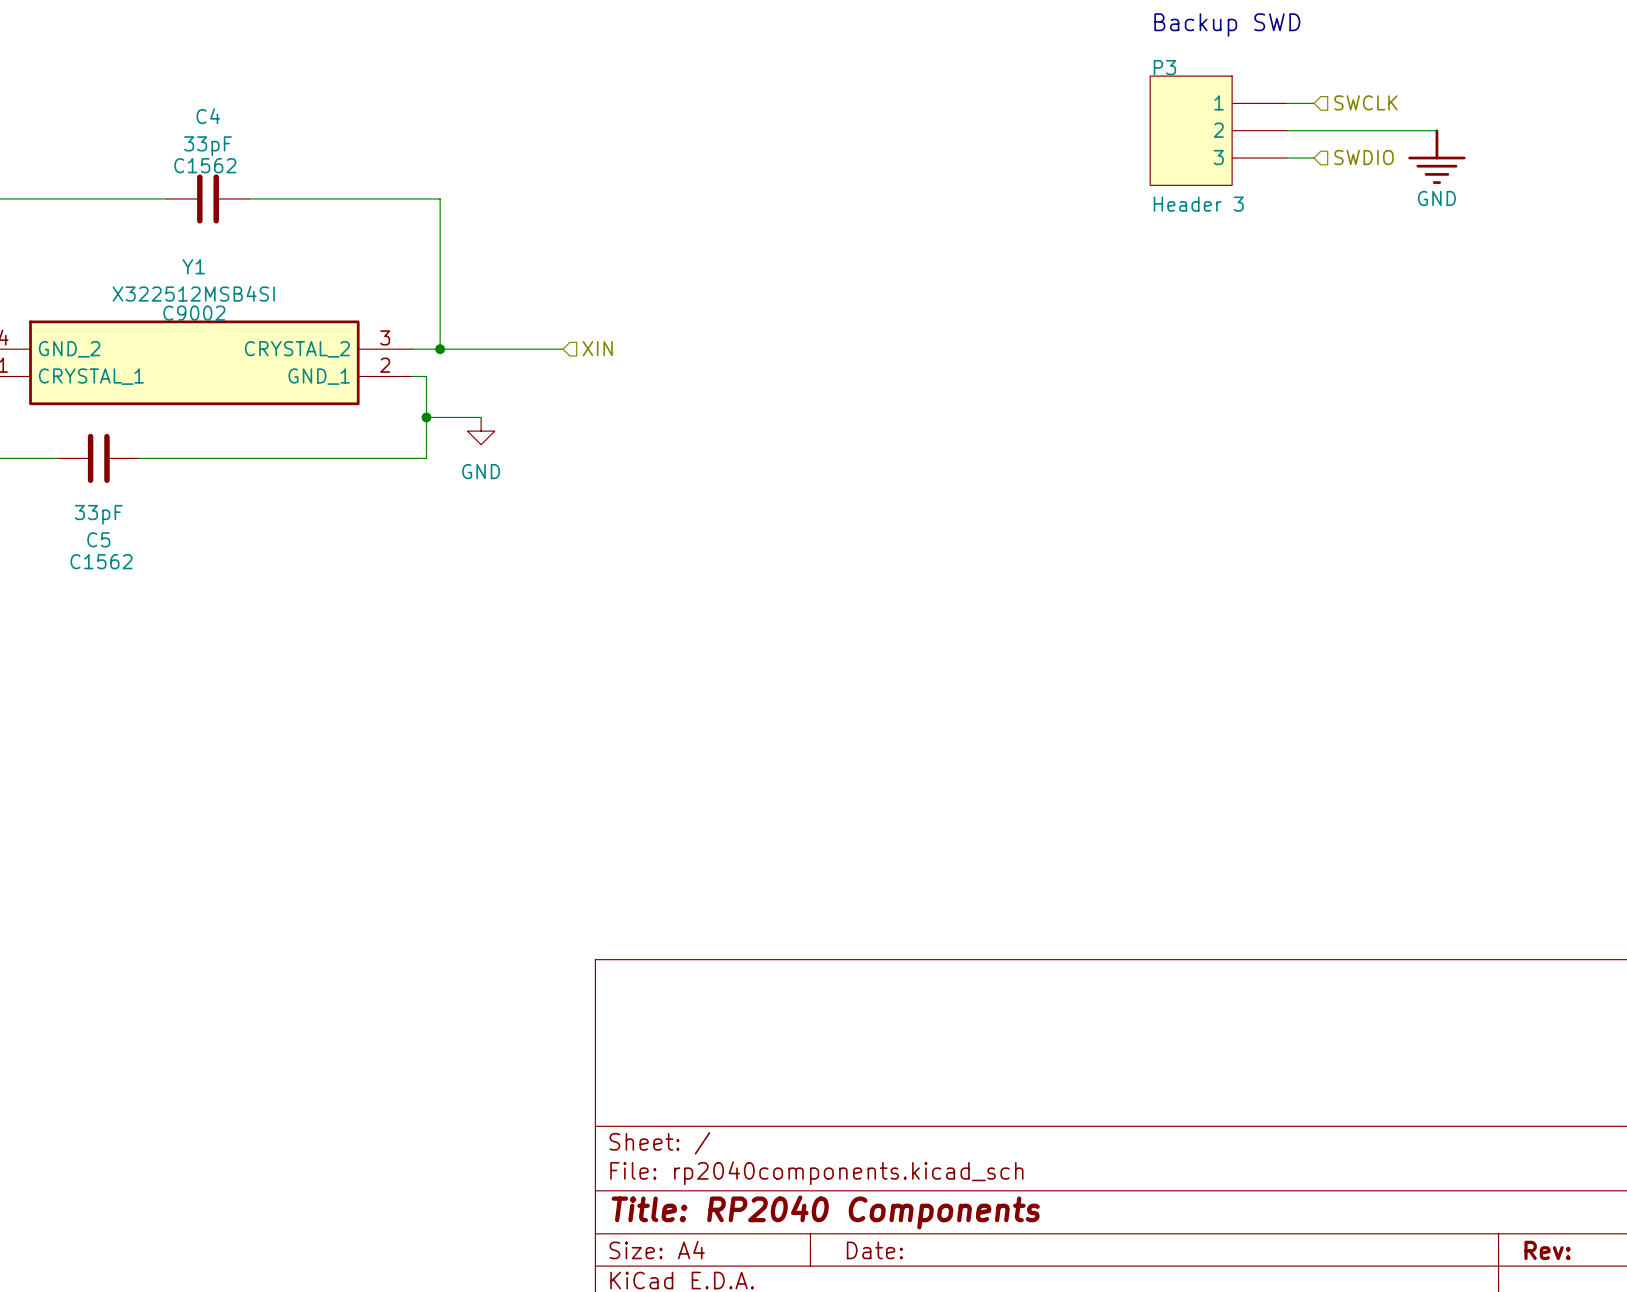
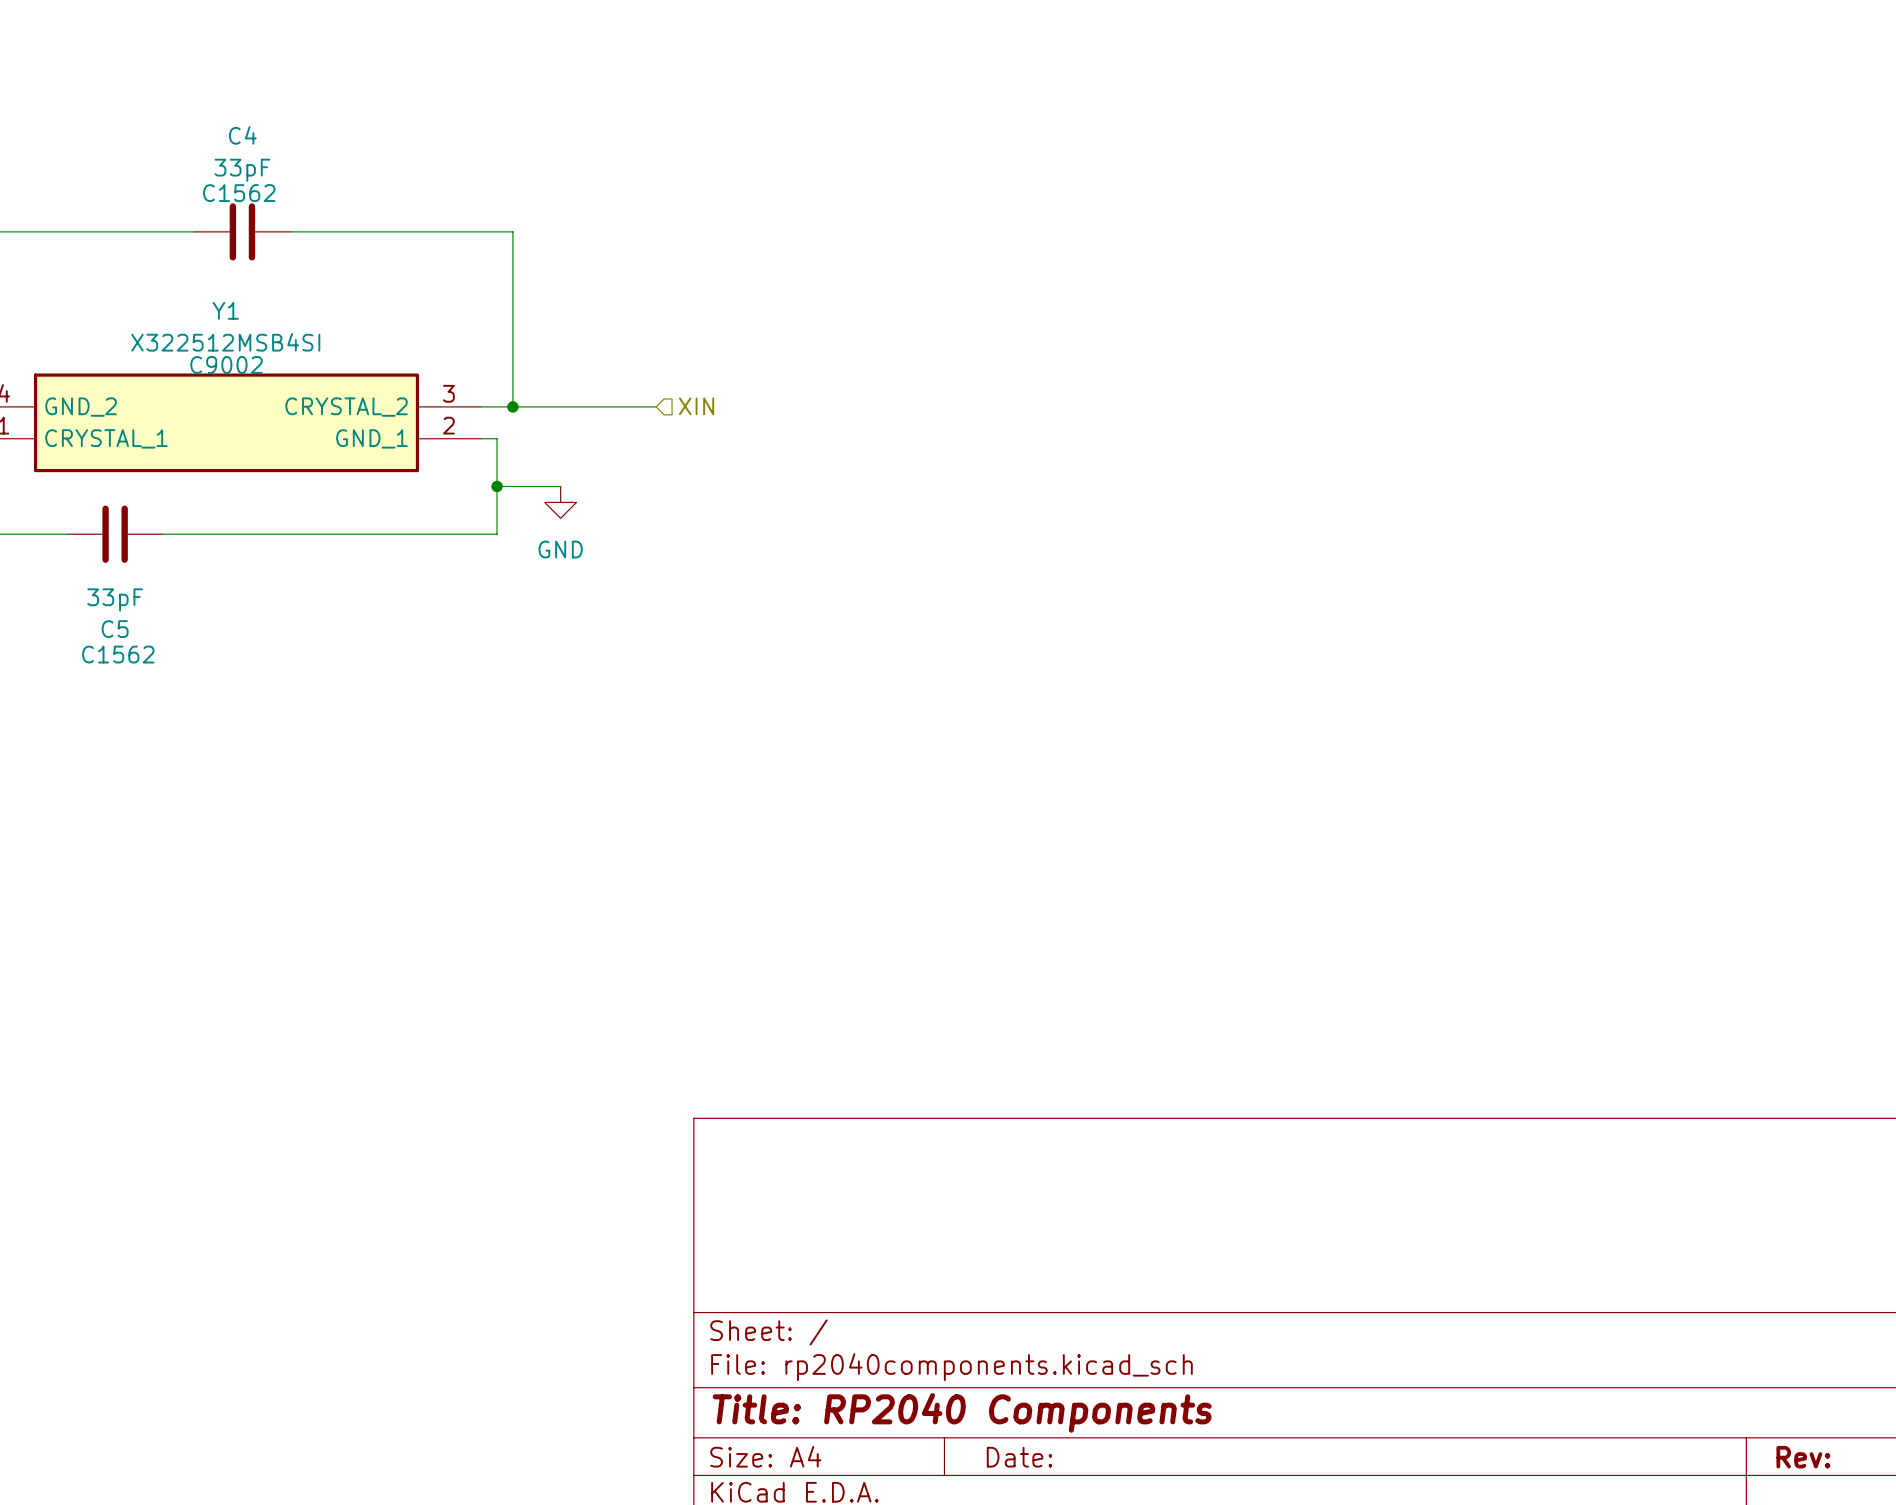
text: Backup SWD (1227, 24) -> none
hierarchical label: SWCLK (1365, 102) -> none
wire: (1286, 103) (1314, 103) -> none
P3: Header 3 (1218, 130) -> none
wire: (1286, 130) (1436, 130) -> none
power symbol: GND (1436, 156) -> none
hierarchical label: SWDIO (1364, 157) -> none
wire: (1286, 158) (1314, 158) -> none

